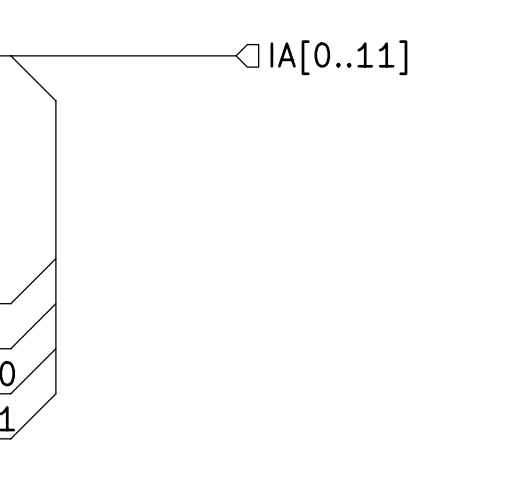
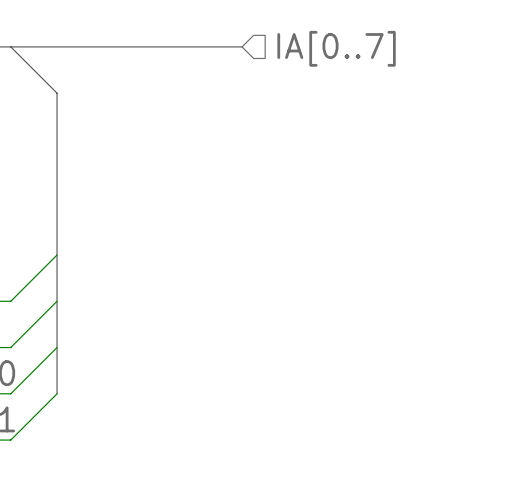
hierarchical label: IA[0..11] (338, 57) -> IA[0..7] (336, 48)

